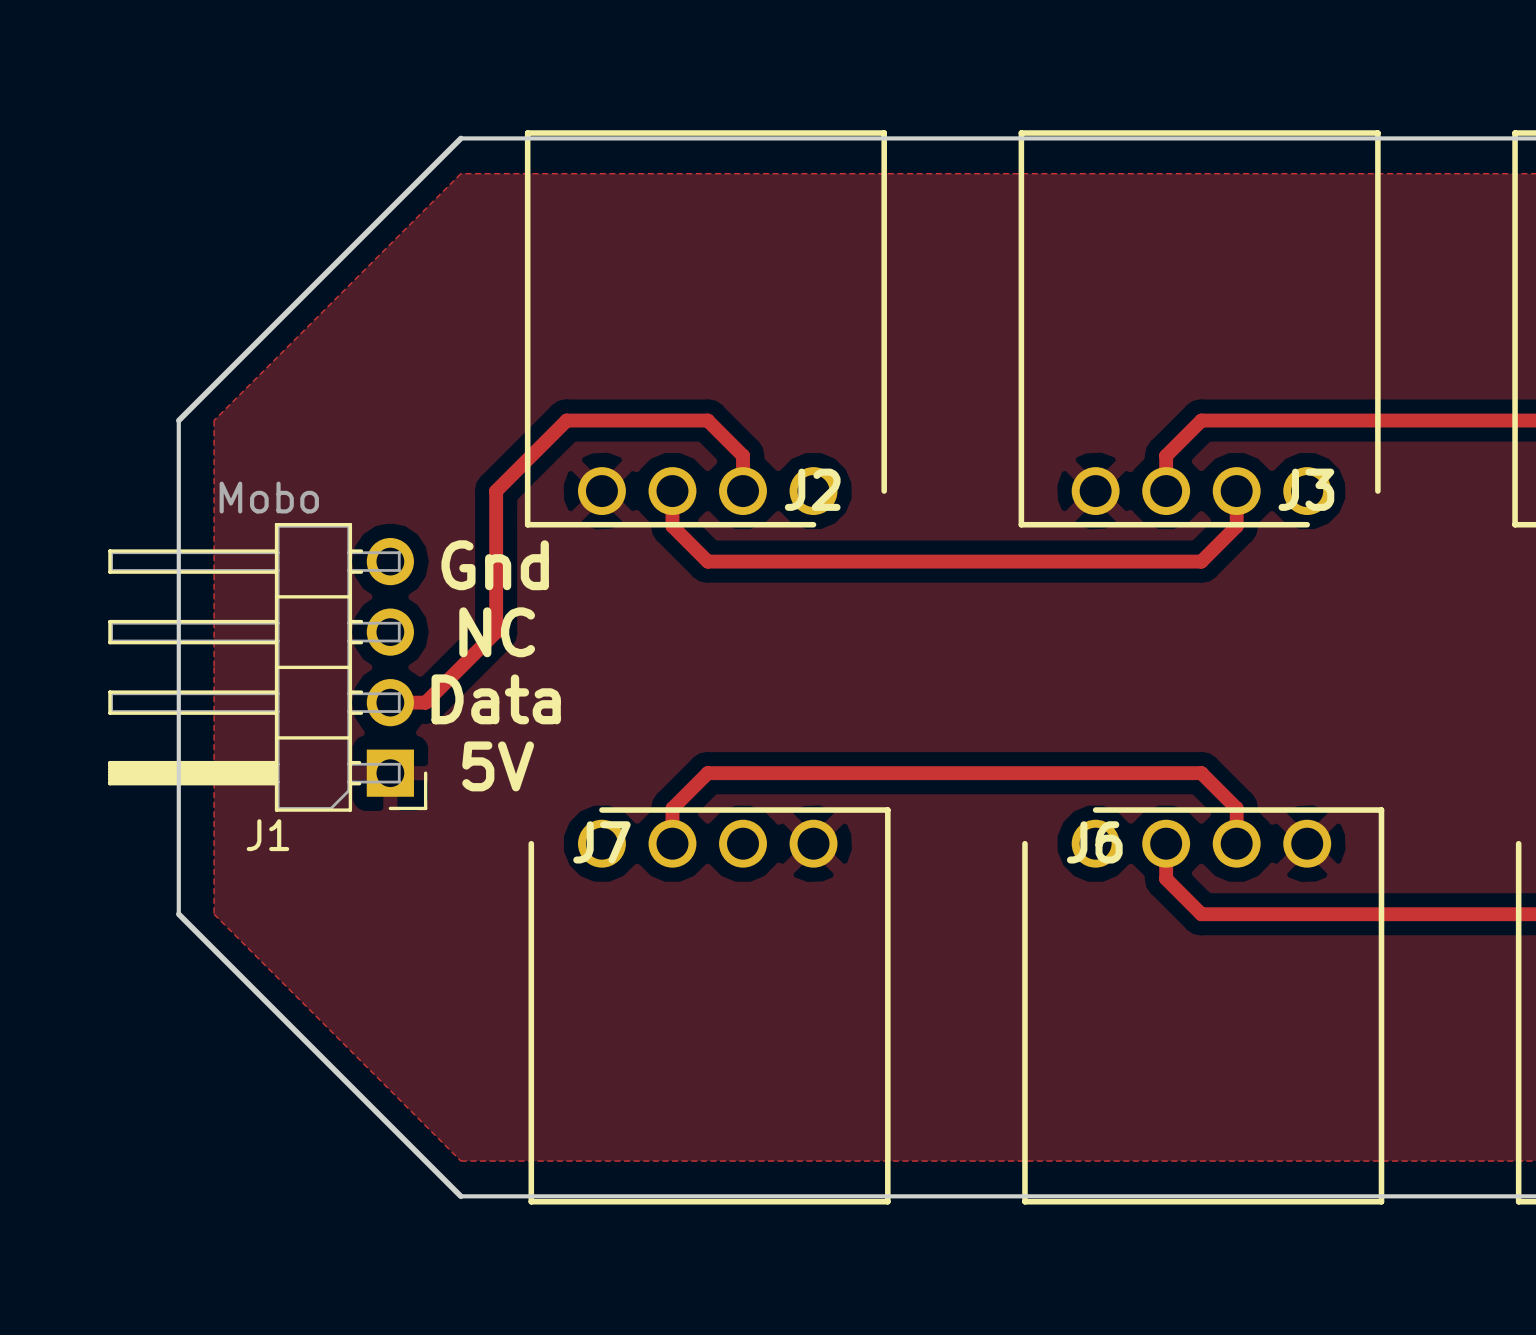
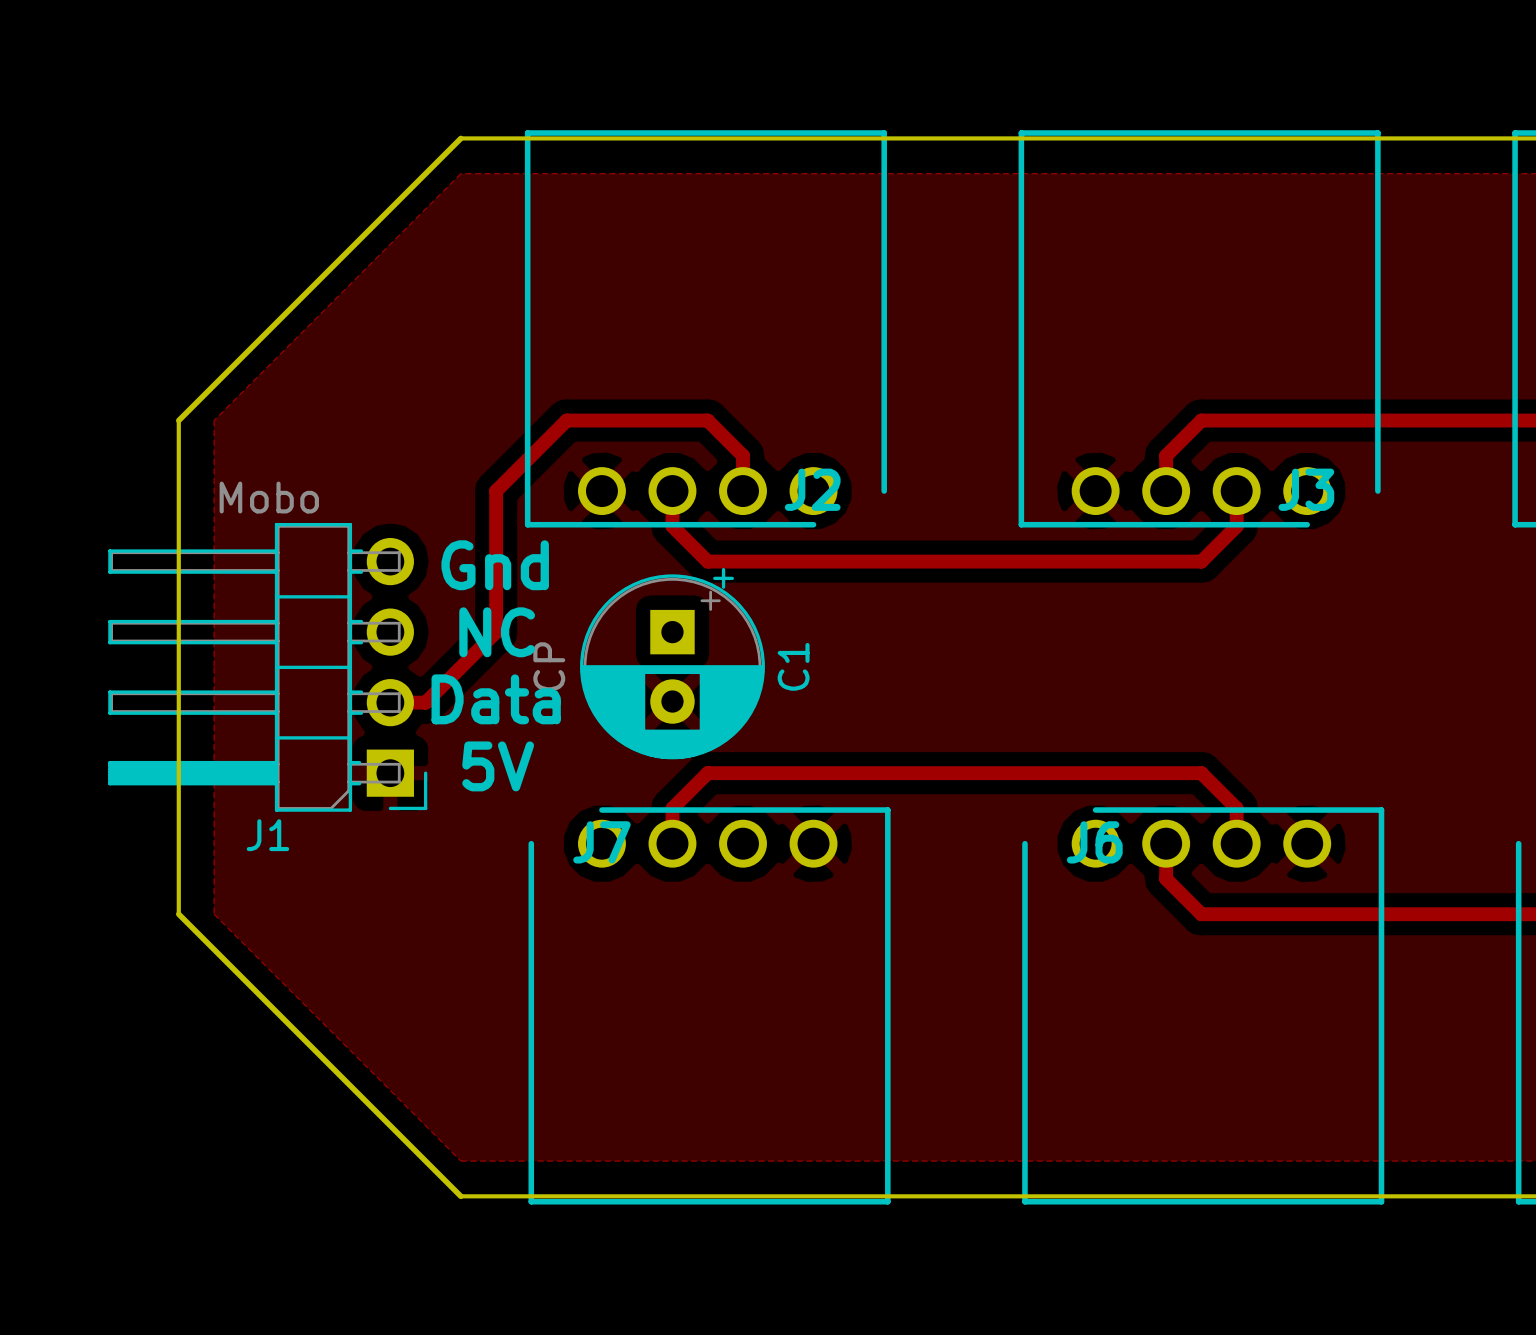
C1: none -> CP (672, 663)

